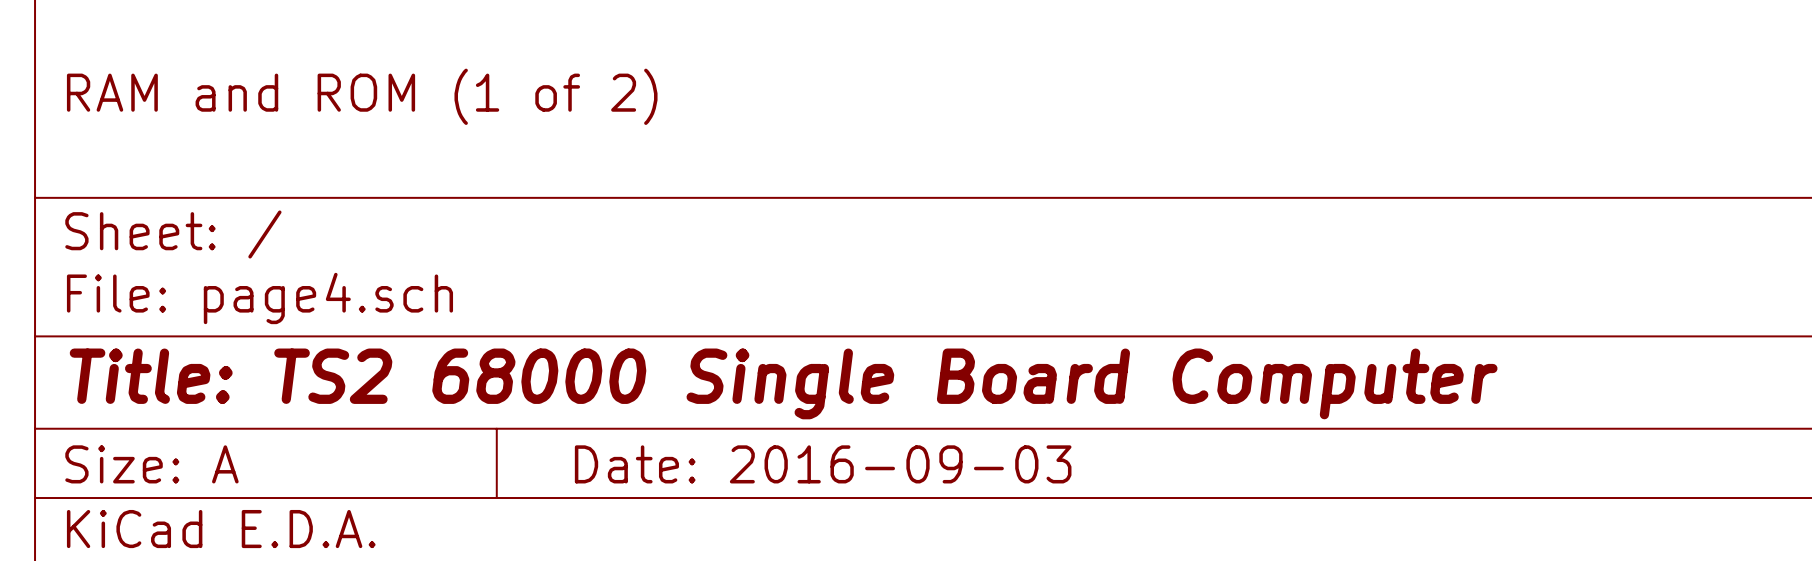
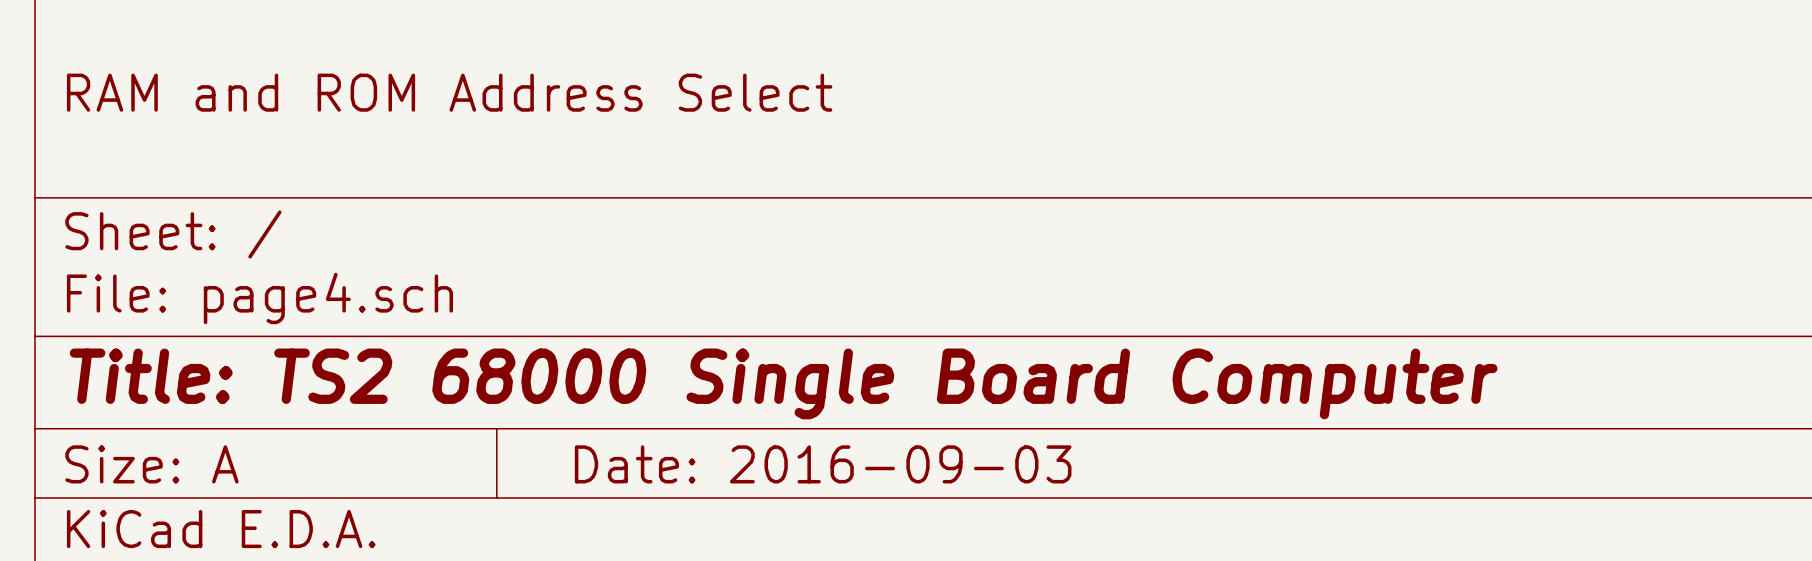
title block: RAM and ROM (1 of 2) (362, 96) -> RAM and ROM Address Select (449, 92)

